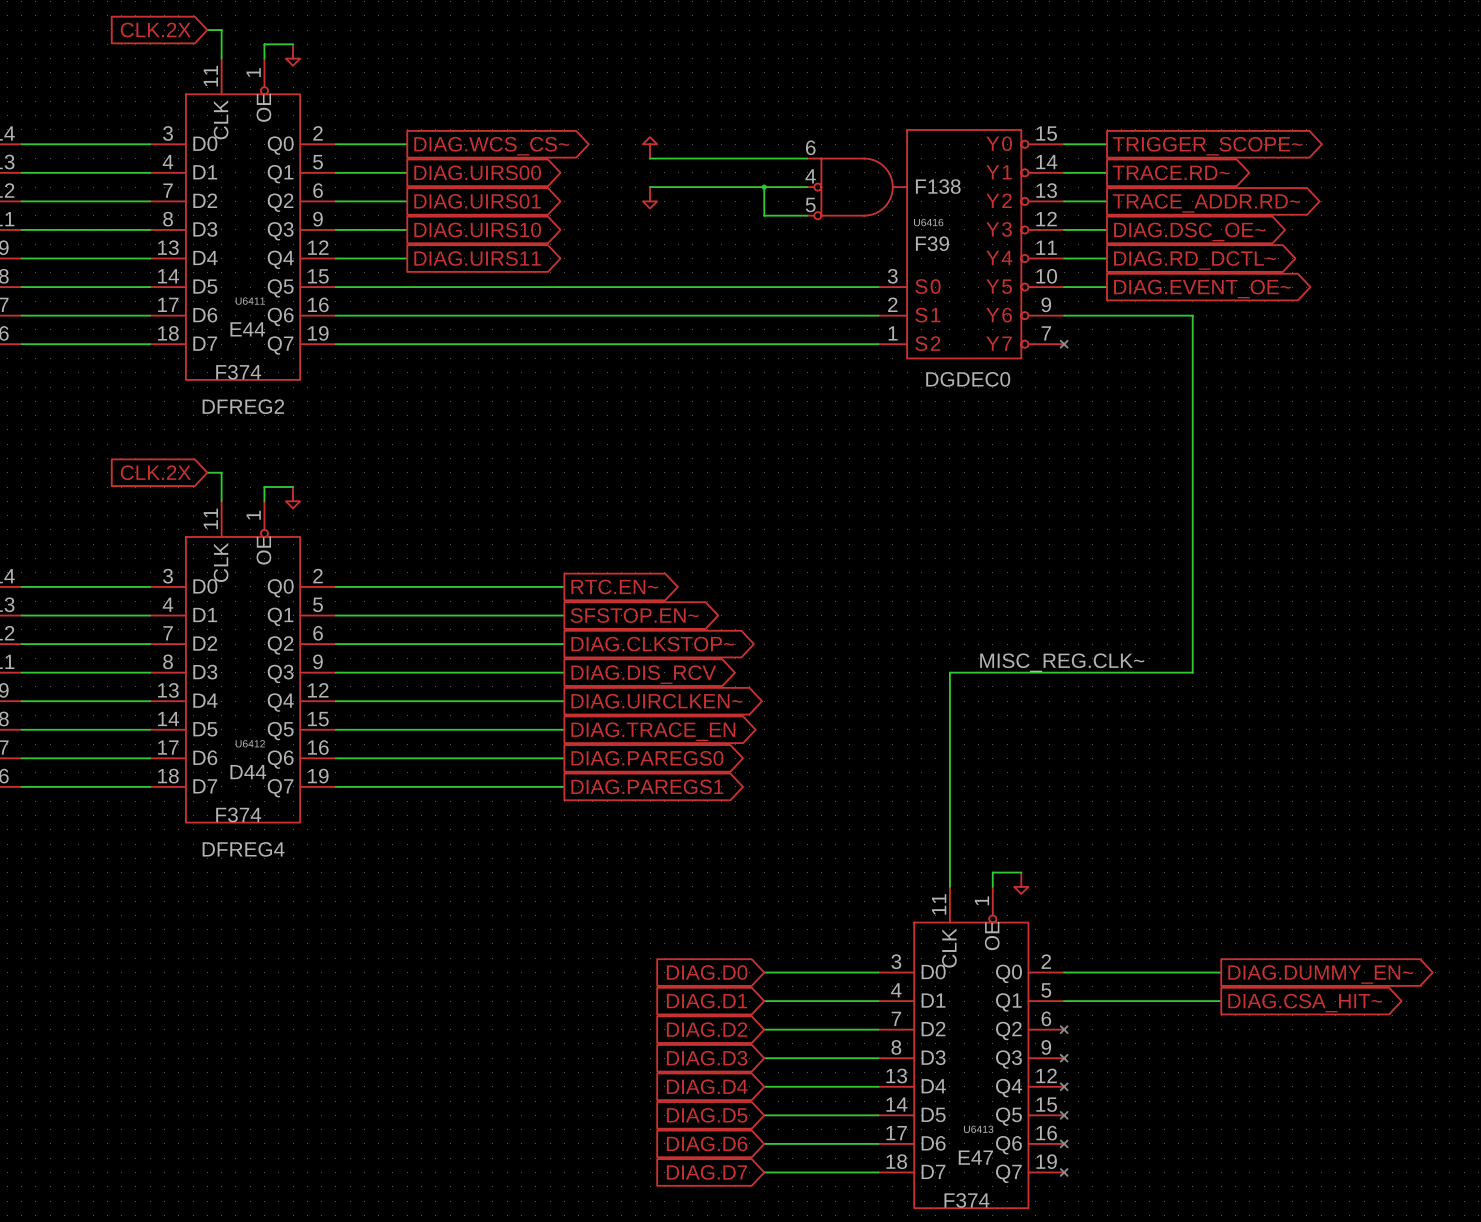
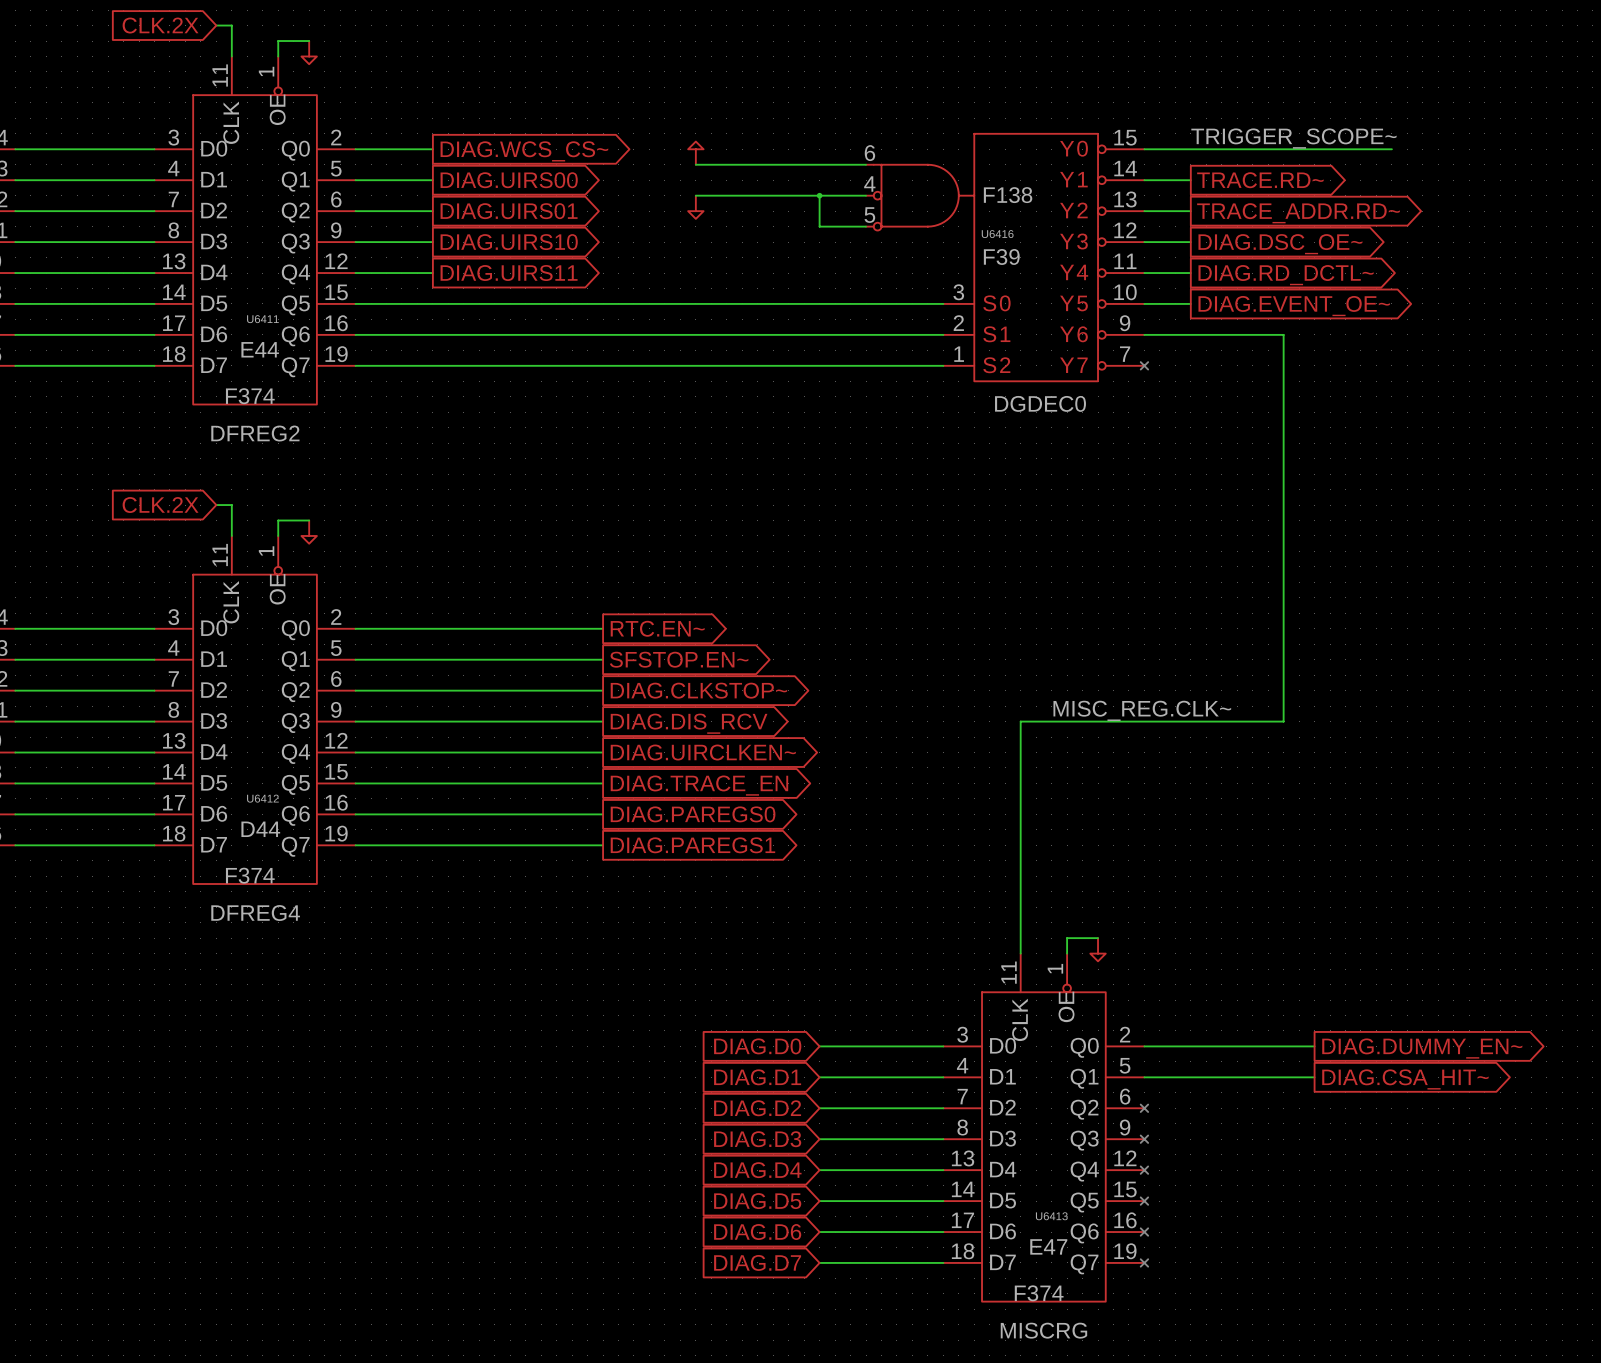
label: none -> TRIGGER_SCOPE~ (1293, 138)
wire: none -> (1190, 149) (1391, 149)
global label: TRIGGER_SCOPE~ (1207, 146) -> none

